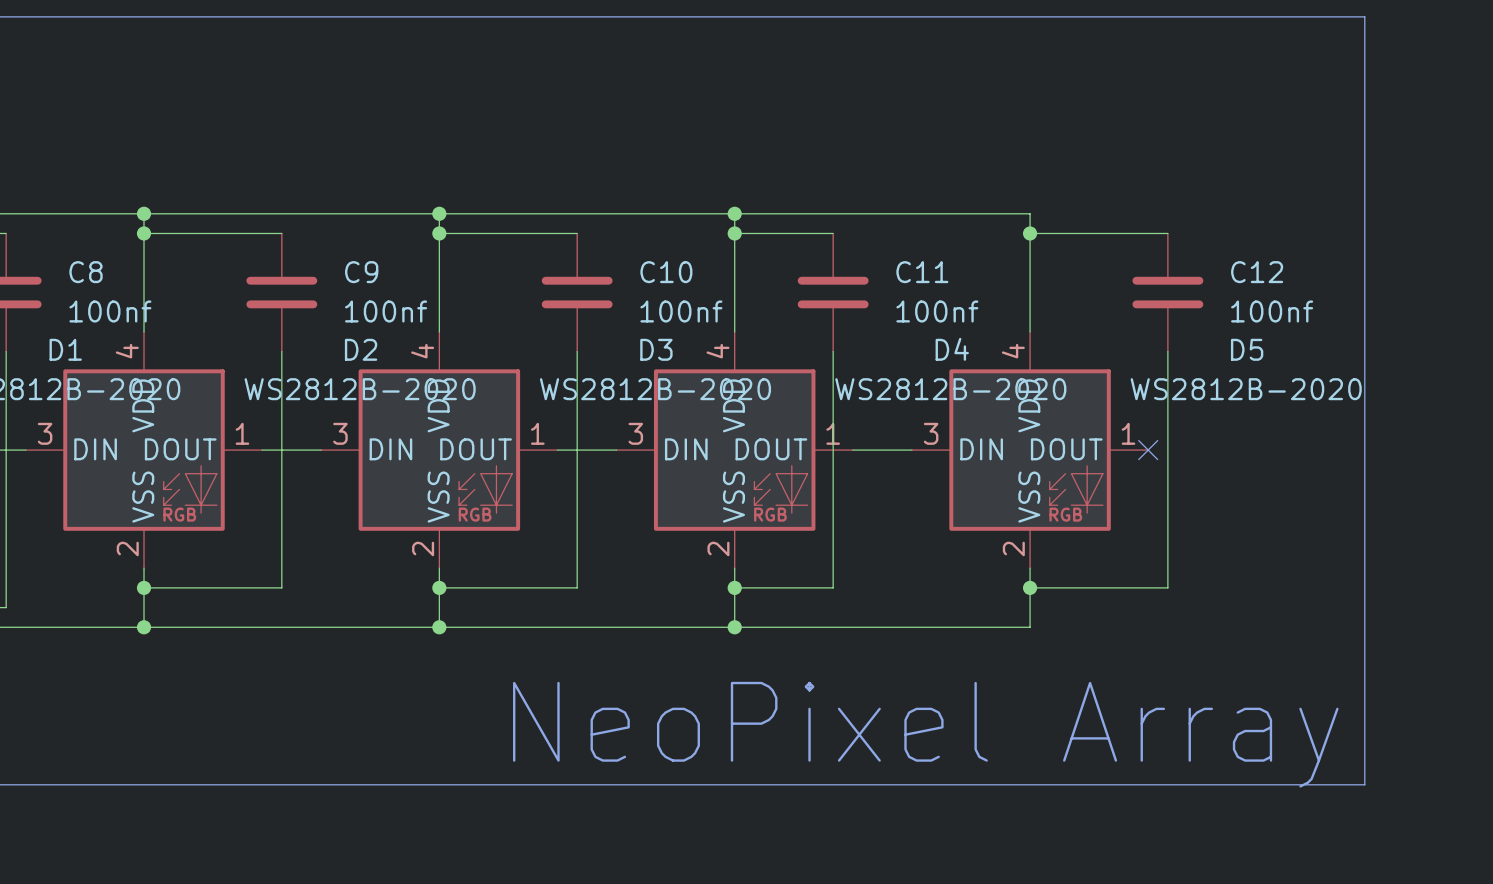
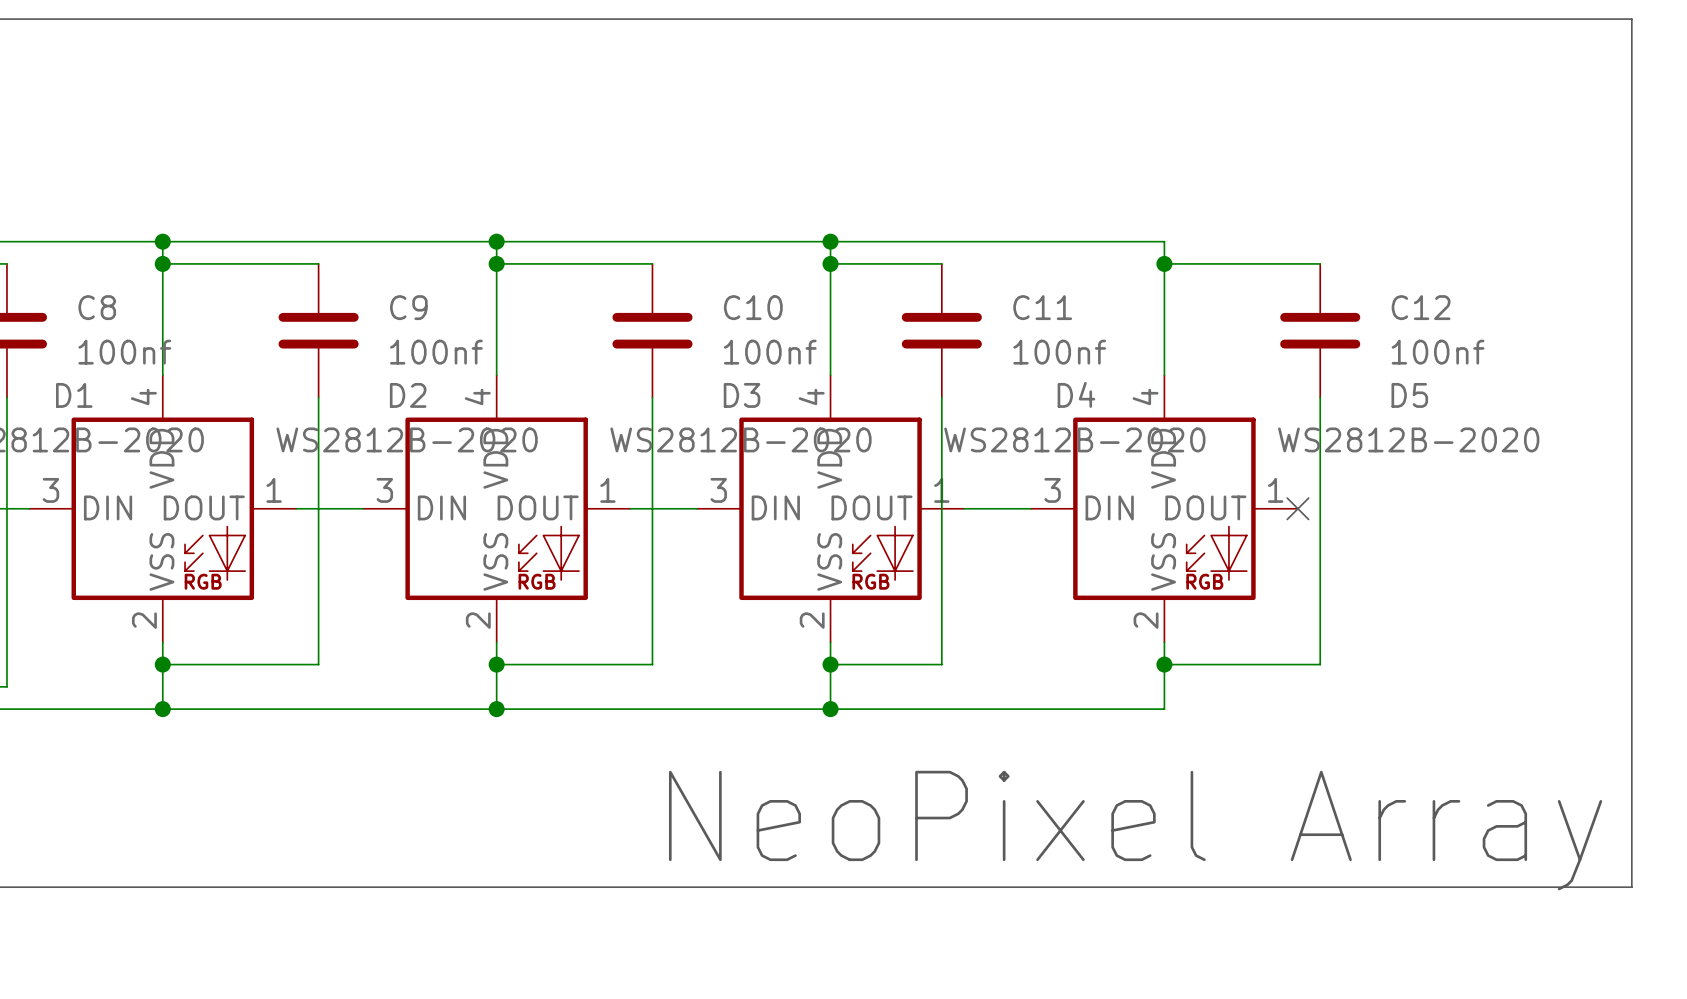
line: (1364, 16) (1364, 784) -> (1542, 19) (1631, 19) (1631, 887) (1542, 887)
text position: NeoPixel Array (925, 734) -> NeoPixel Array (1135, 830)

